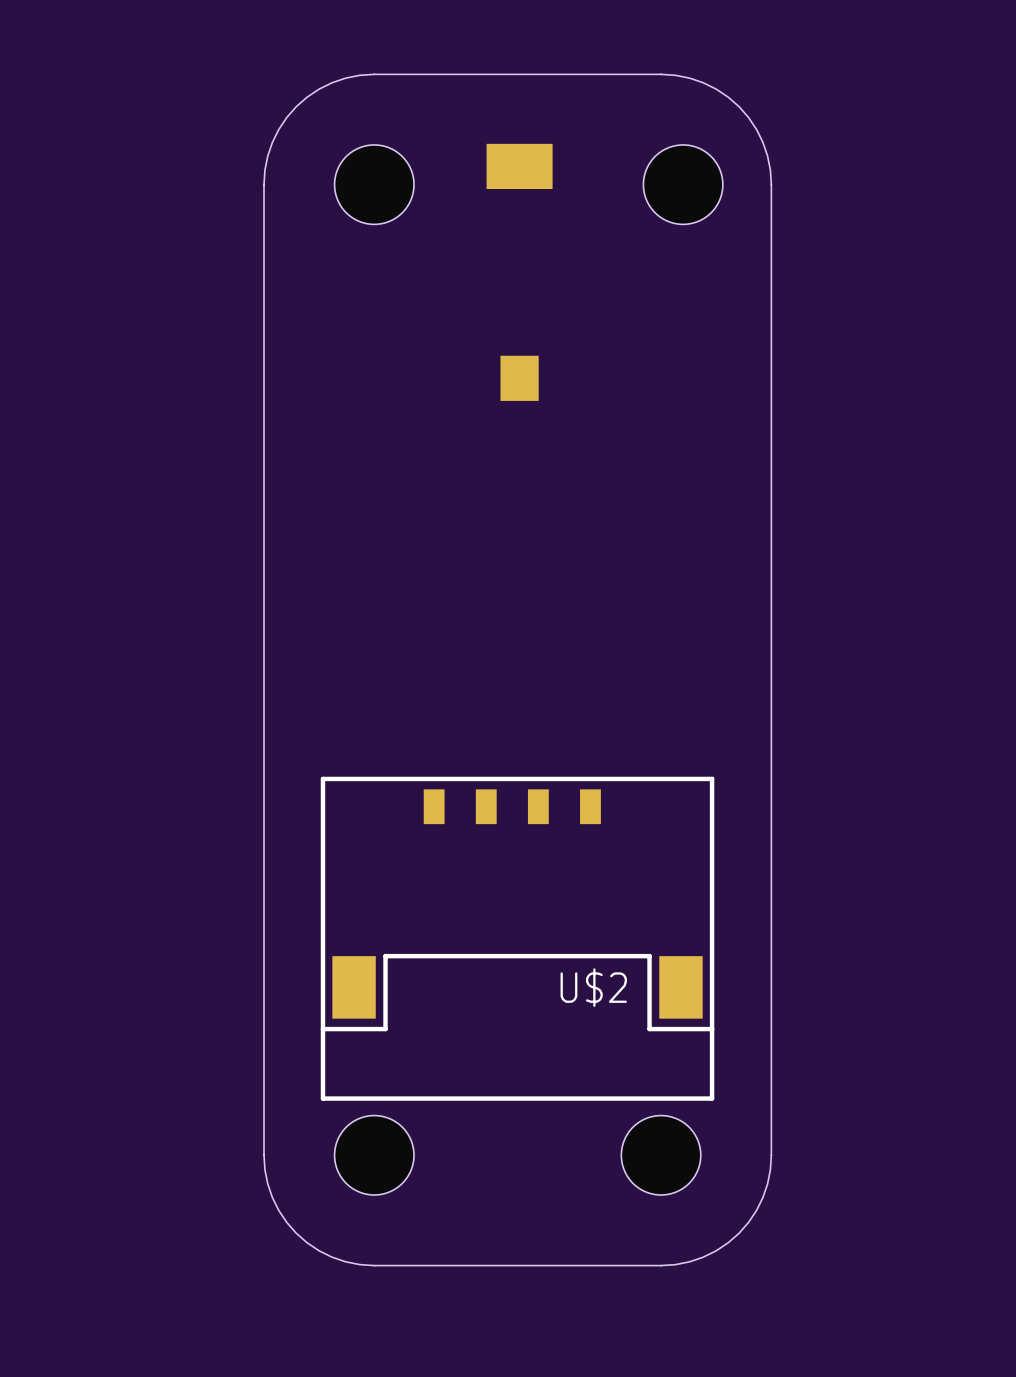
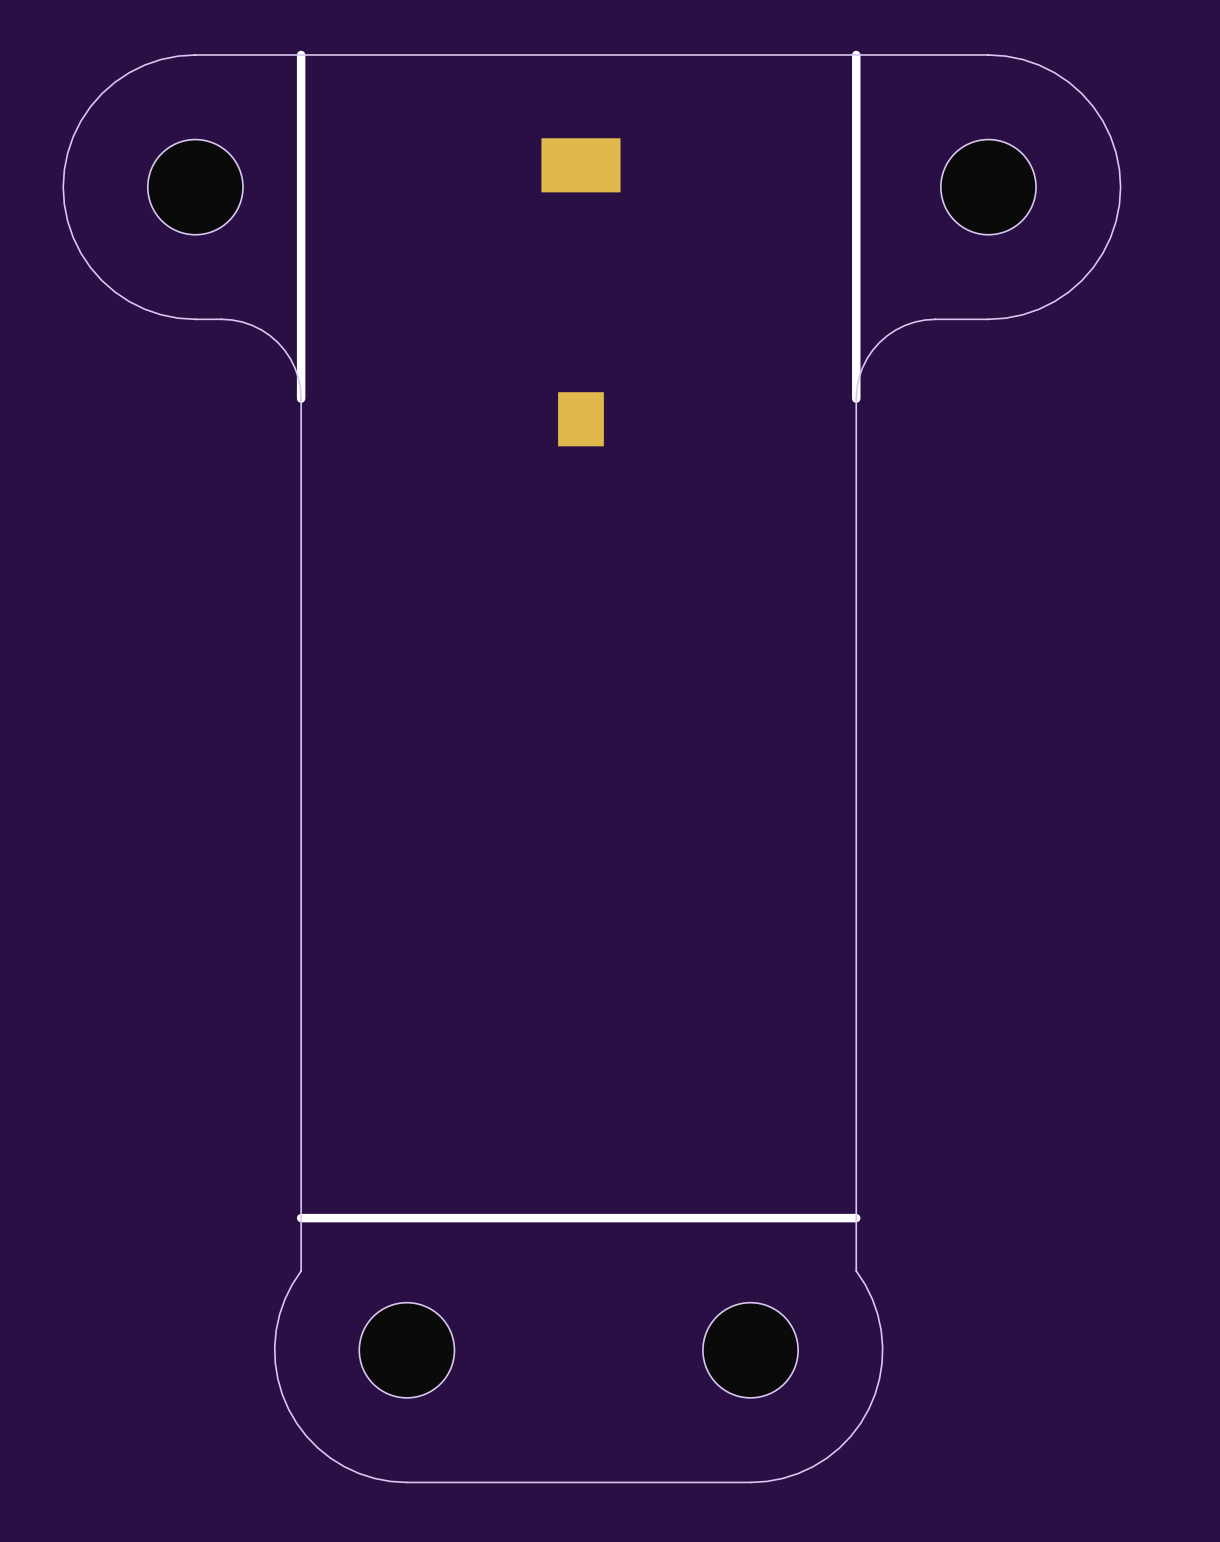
line: none -> (301, 54) (301, 398)
board edge: (374, 74) (345, 78) (332, 82) (319, 89) (296, 106) (278, 129) (272, 142) (267, 156) (263, 184) (264, 1169) (272, 1197) (278, 1210) (296, 1233) (319, 1250) (332, 1257) (345, 1261) (374, 1265) -> (406, 54) (195, 54) (161, 59) (144, 65) (114, 82) (90, 106) (80, 121) (67, 152) (63, 187) (67, 221) (73, 237) (90, 267) (114, 292) (129, 301) (161, 314) (178, 318) (232, 320) (252, 325) (270, 335) (284, 350) (298, 378) (301, 398) (301, 1270) (292, 1284) (279, 1314) (276, 1330) (275, 1362) (282, 1394) (288, 1409) (306, 1436) (317, 1448) (330, 1458) (359, 1473) (374, 1478) (406, 1482)
board edge: (661, 74) (689, 78) (703, 82) (716, 89) (739, 106) (756, 129) (762, 142) (767, 156) (771, 184) (770, 1169) (762, 1197) (756, 1210) (739, 1233) (716, 1250) (703, 1257) (689, 1261) (661, 1265) -> (750, 54) (988, 54) (1022, 59) (1039, 65) (1068, 82) (1093, 106) (1102, 121) (1116, 152) (1120, 187) (1116, 221) (1110, 237) (1093, 267) (1068, 292) (1054, 301) (1022, 314) (988, 319) (925, 320) (905, 325) (887, 335) (872, 350) (858, 378) (856, 398) (856, 1270) (865, 1284) (877, 1314) (881, 1330) (882, 1362) (875, 1394) (868, 1409) (850, 1436) (839, 1448) (826, 1458) (798, 1473) (782, 1478) (750, 1482)
line: none -> (856, 54) (856, 398)
hole position: (374, 184) -> (195, 187)
hole position: (683, 184) -> (988, 187)
U$2: (517, 938) -> none
line: none -> (301, 1218) (856, 1218)

